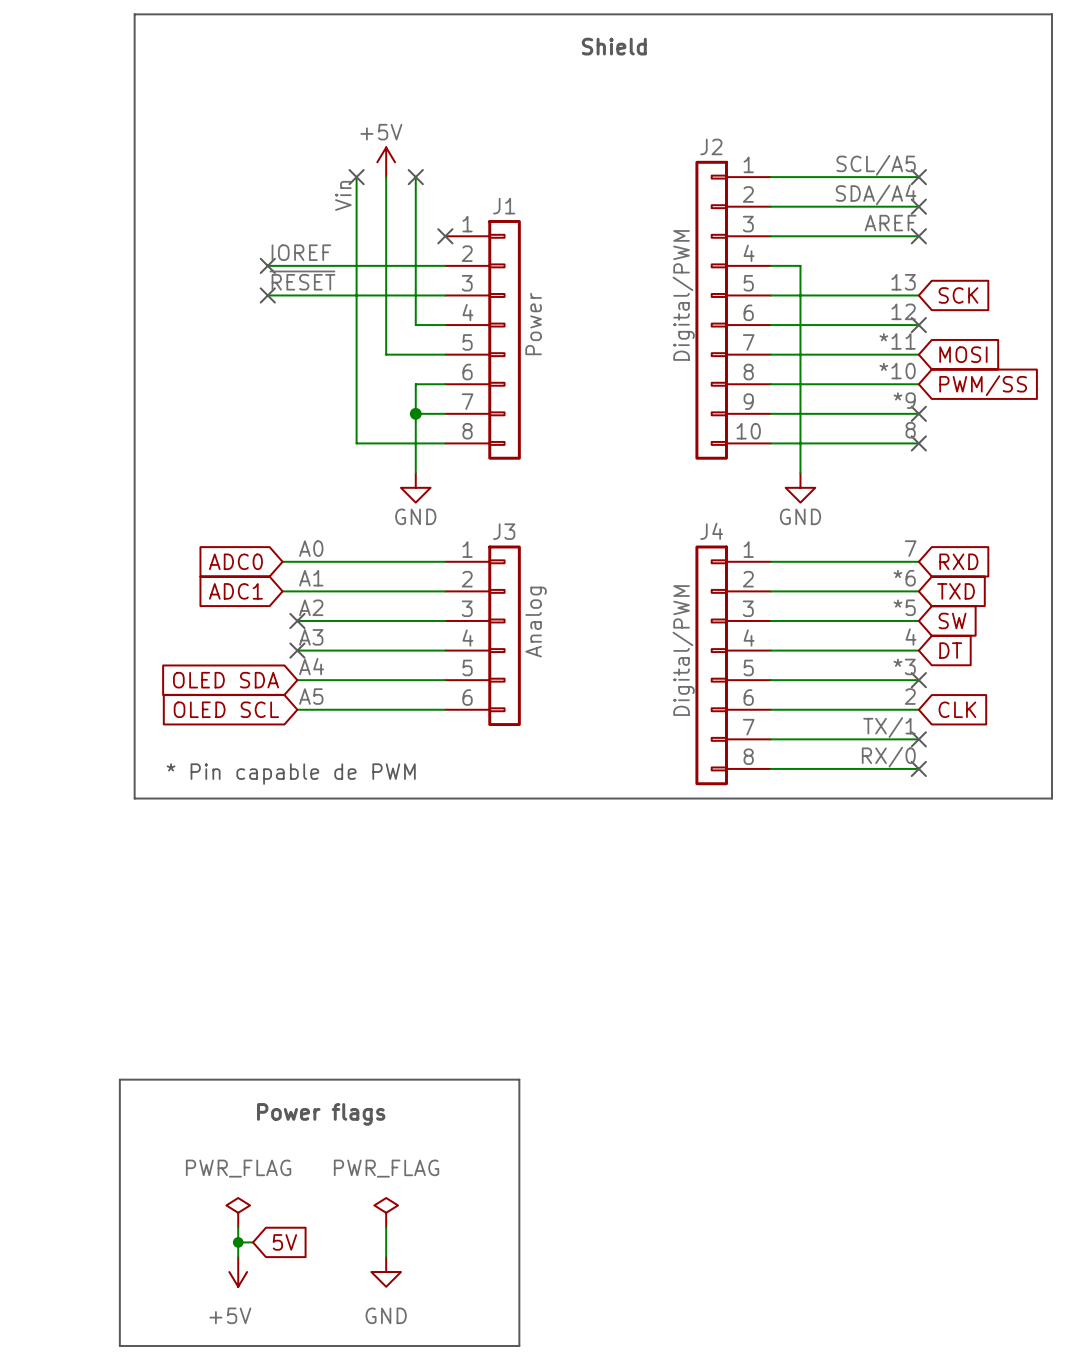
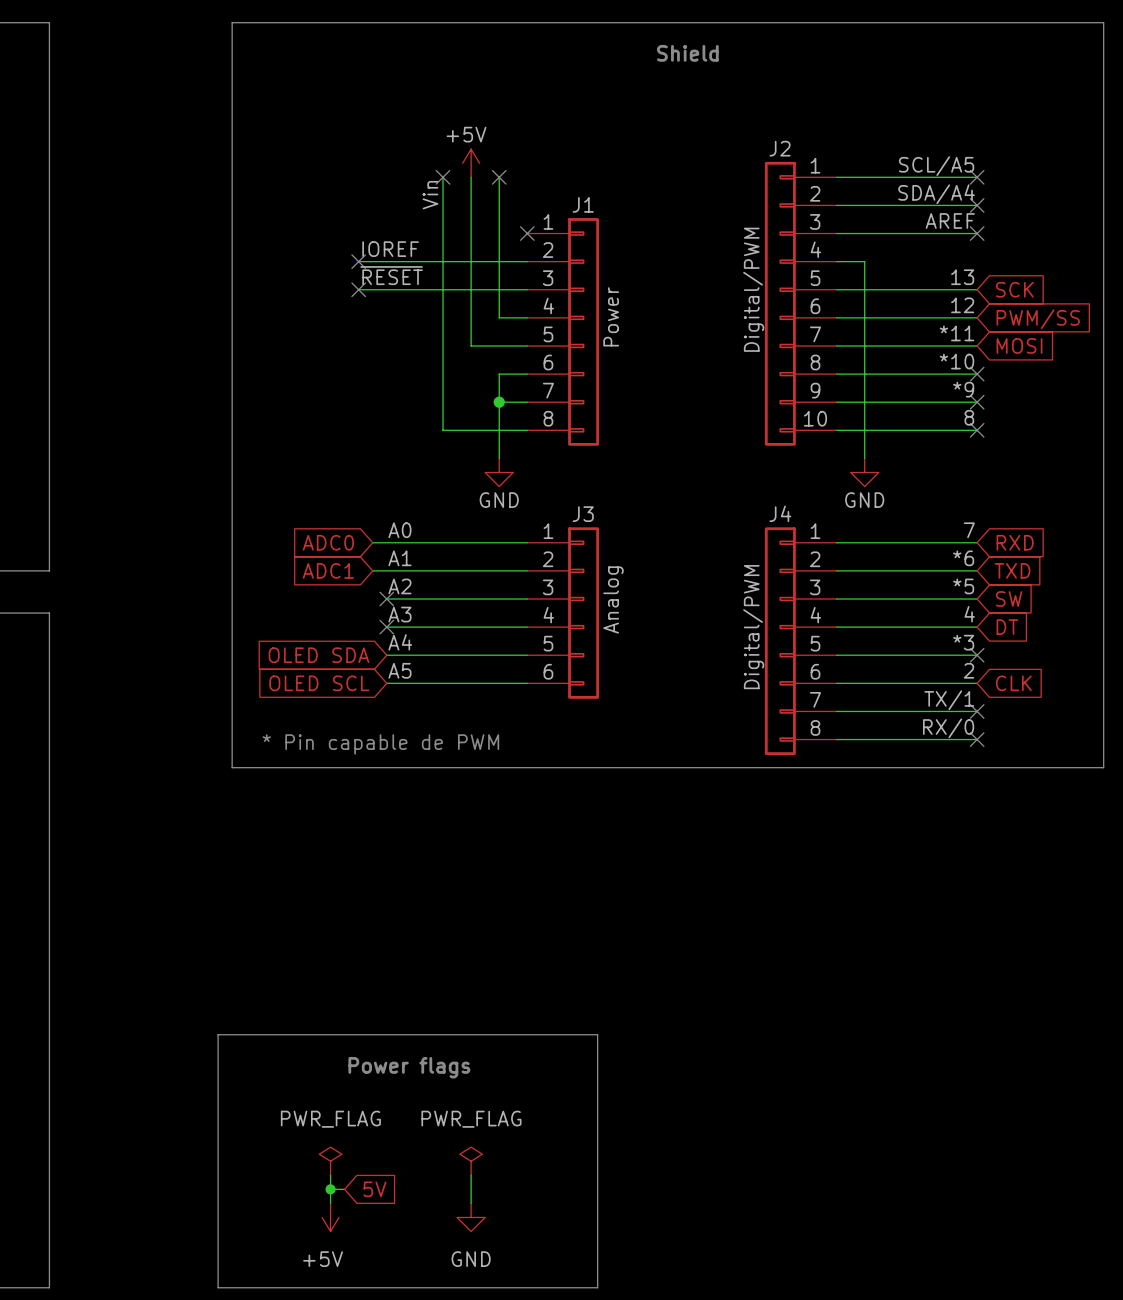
no-connect mark position: (918, 325) -> (977, 374)
global label position: PWM/SS (983, 385) -> PWM/SS (1038, 319)

